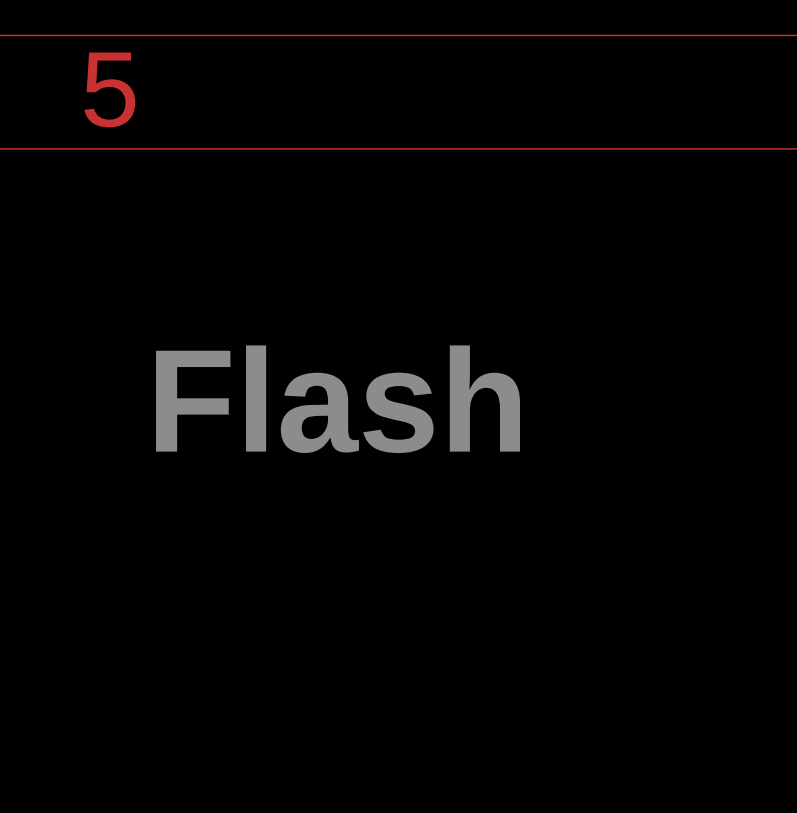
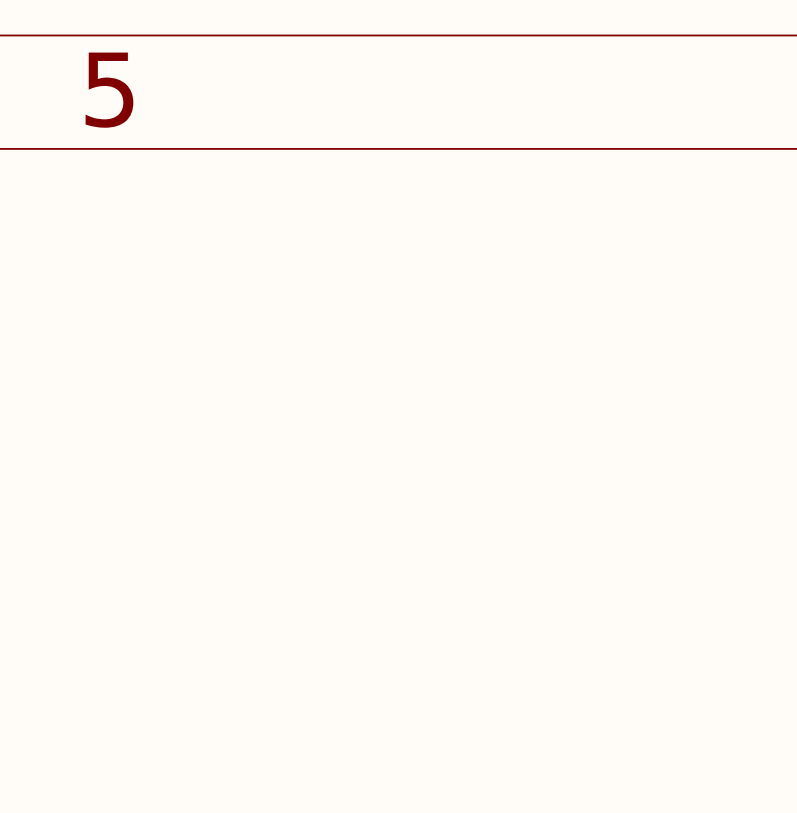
text: Flash (338, 399) -> none

